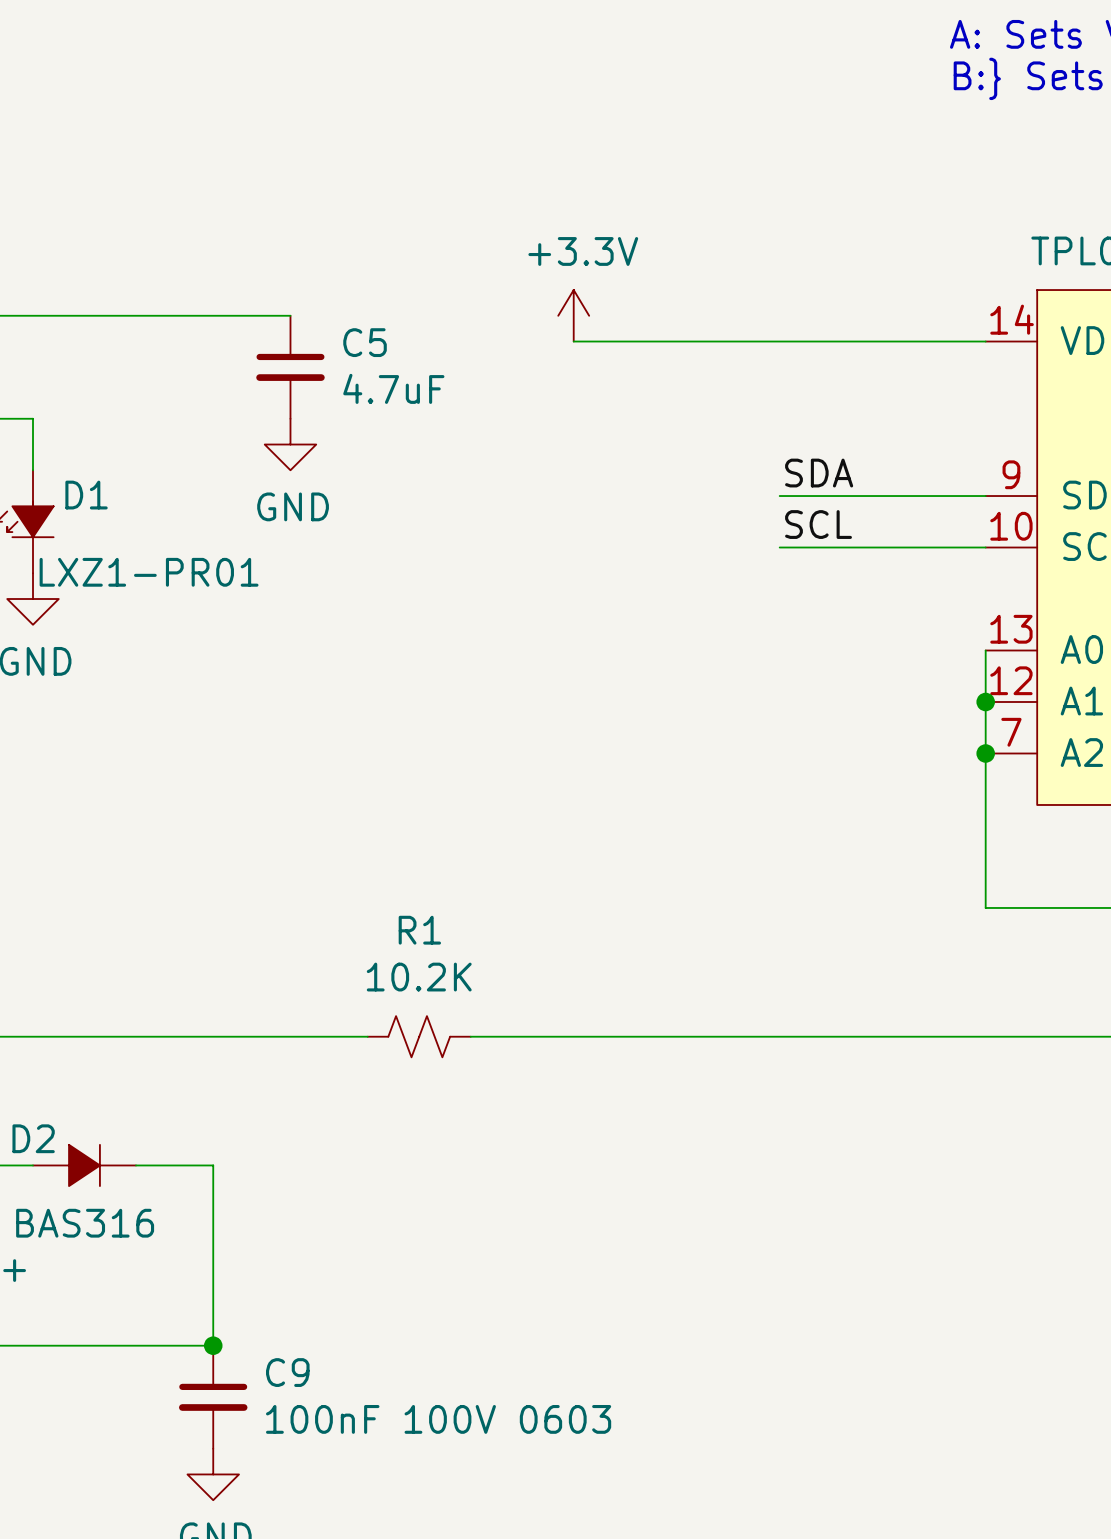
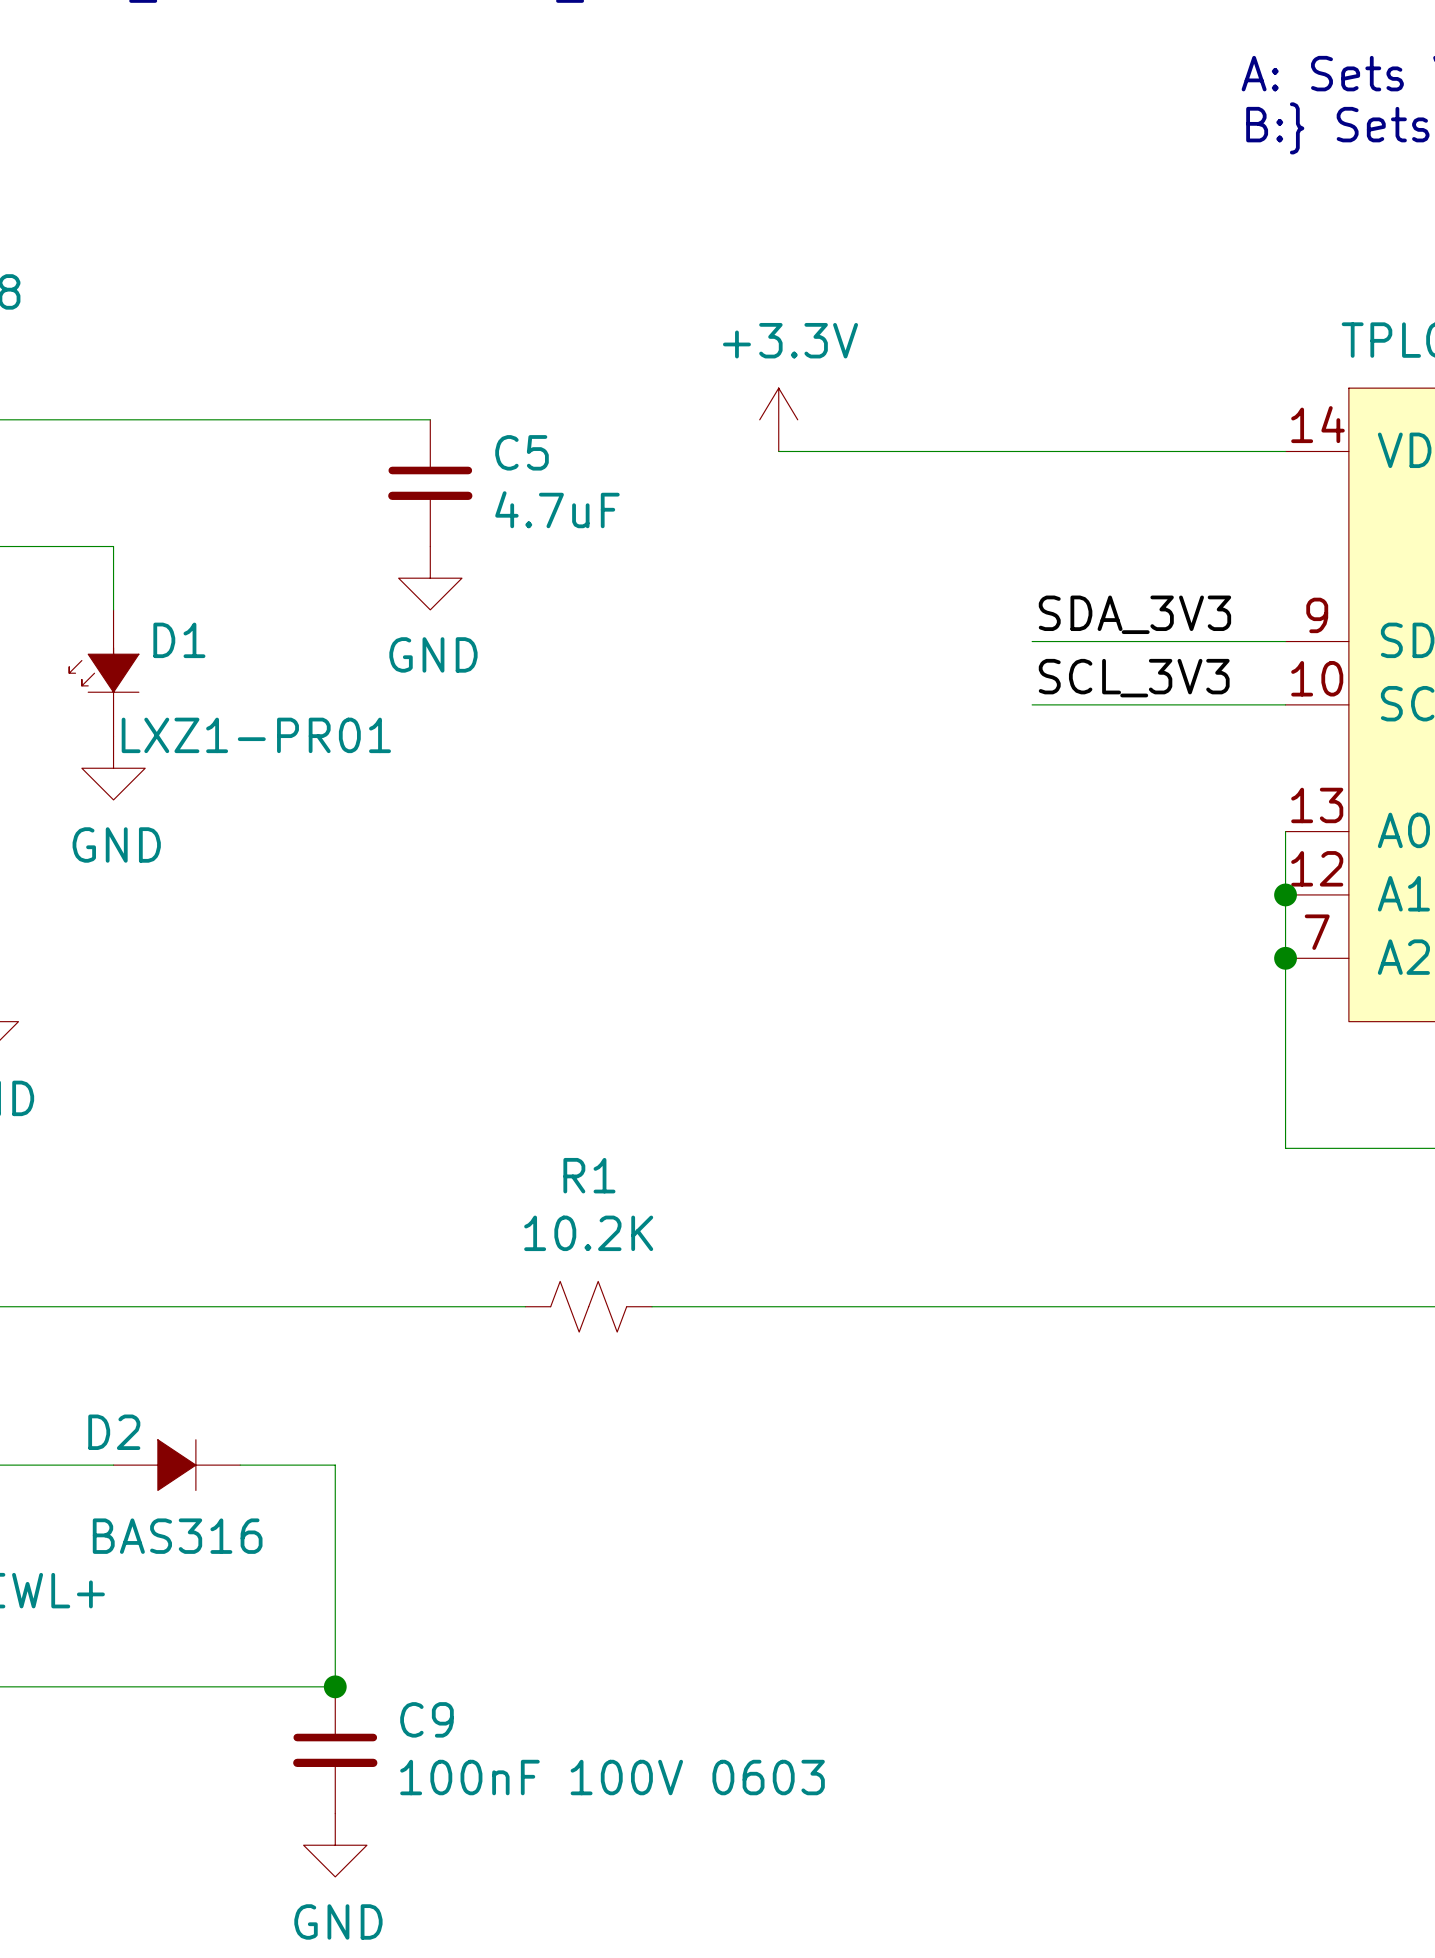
label: SDA (819, 473) -> SDA_3V3 (1134, 614)
label: SCL (818, 524) -> SCL_3V3 (1134, 678)

